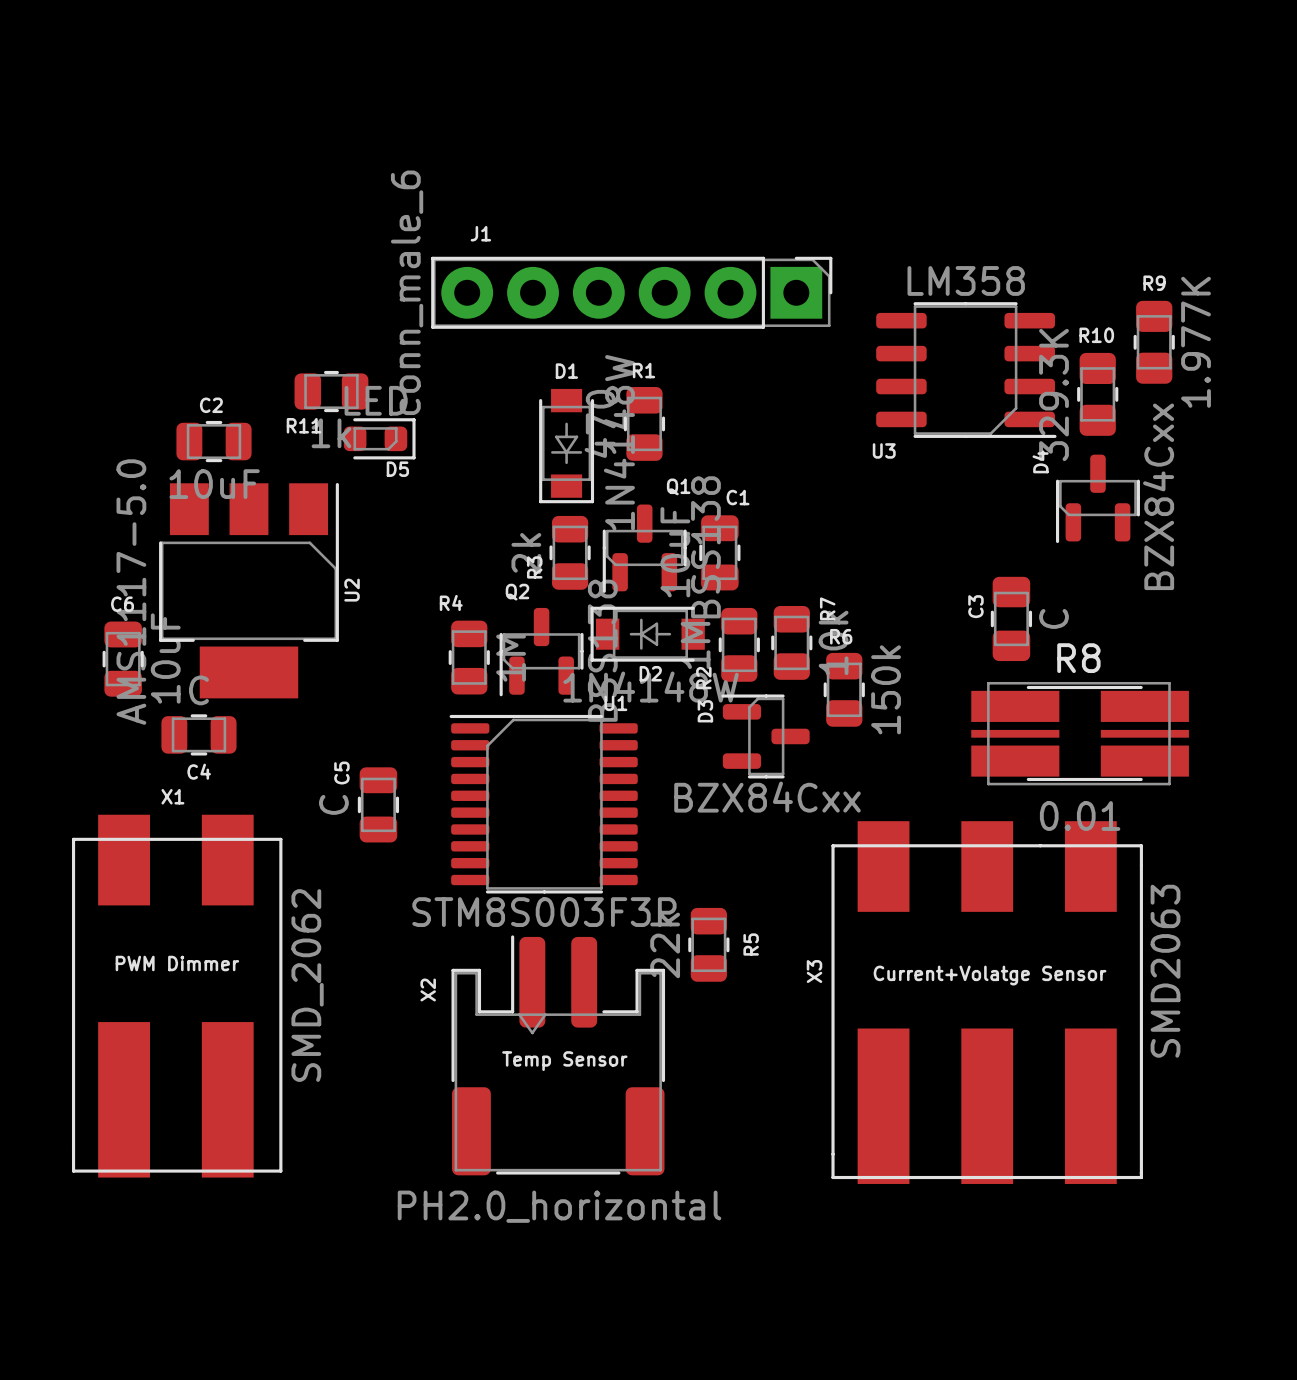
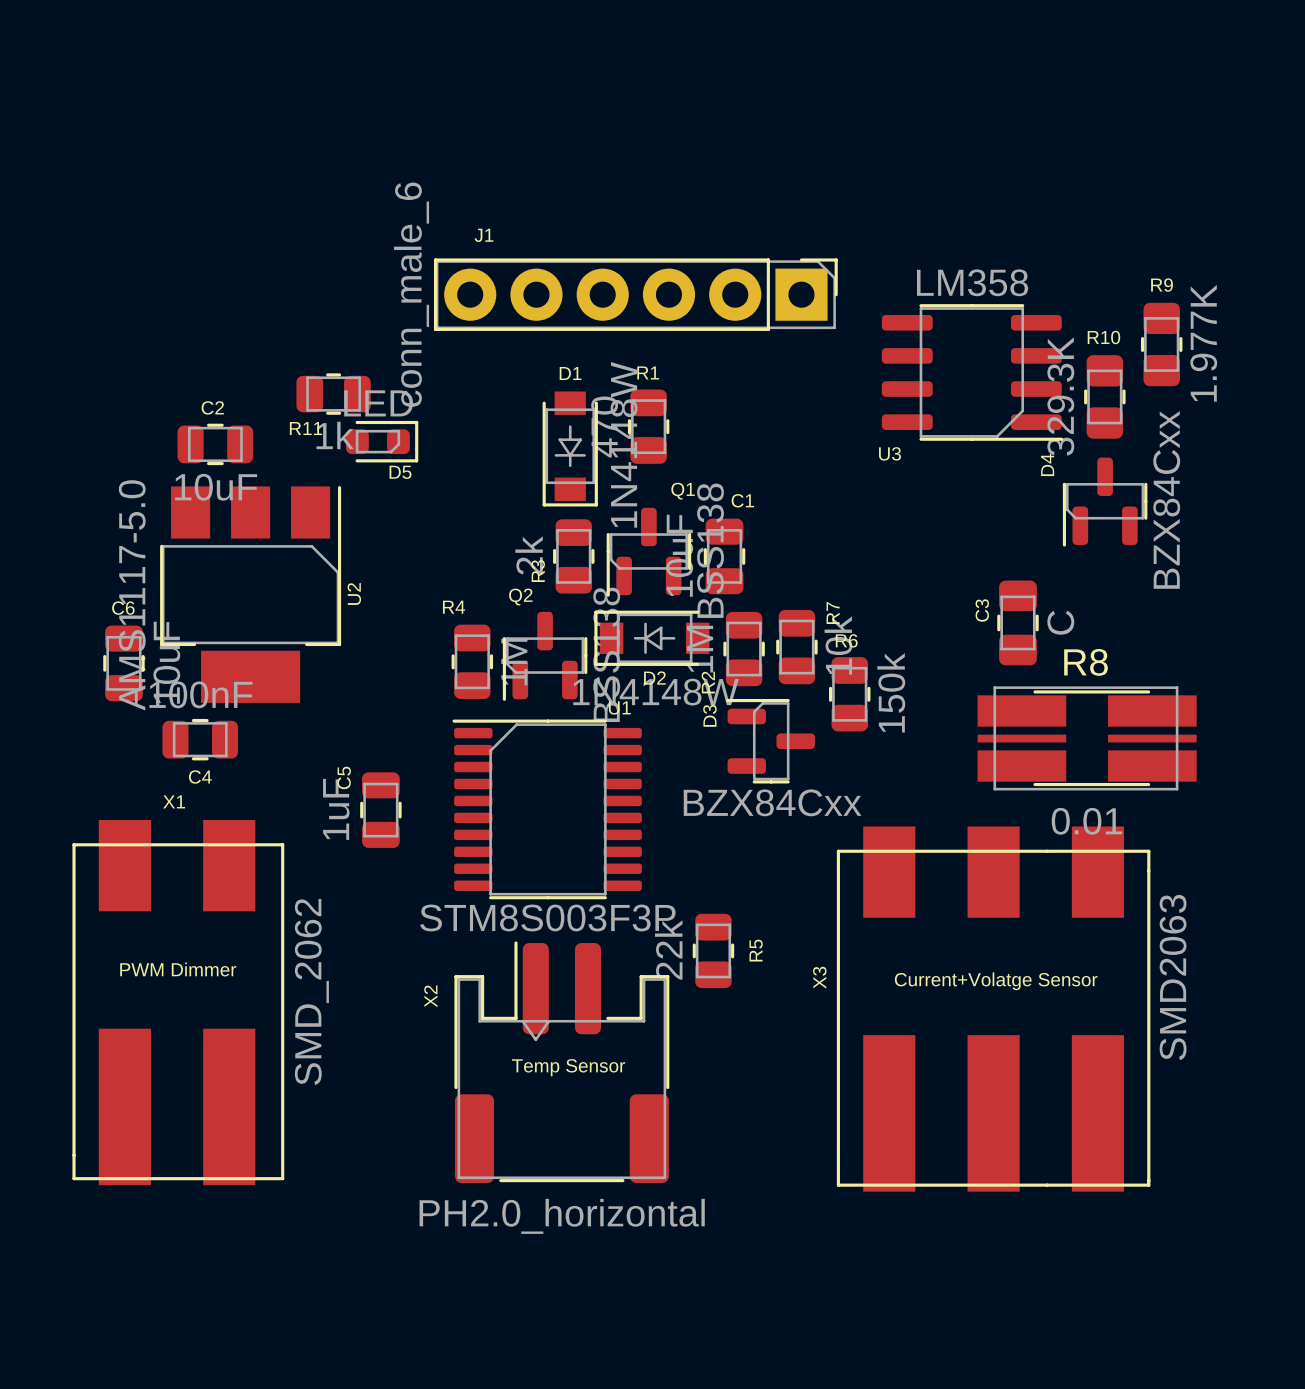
C4 value: C (198, 690) -> 100nF (200, 694)
C5 value: C (333, 804) -> 1uF (336, 809)

